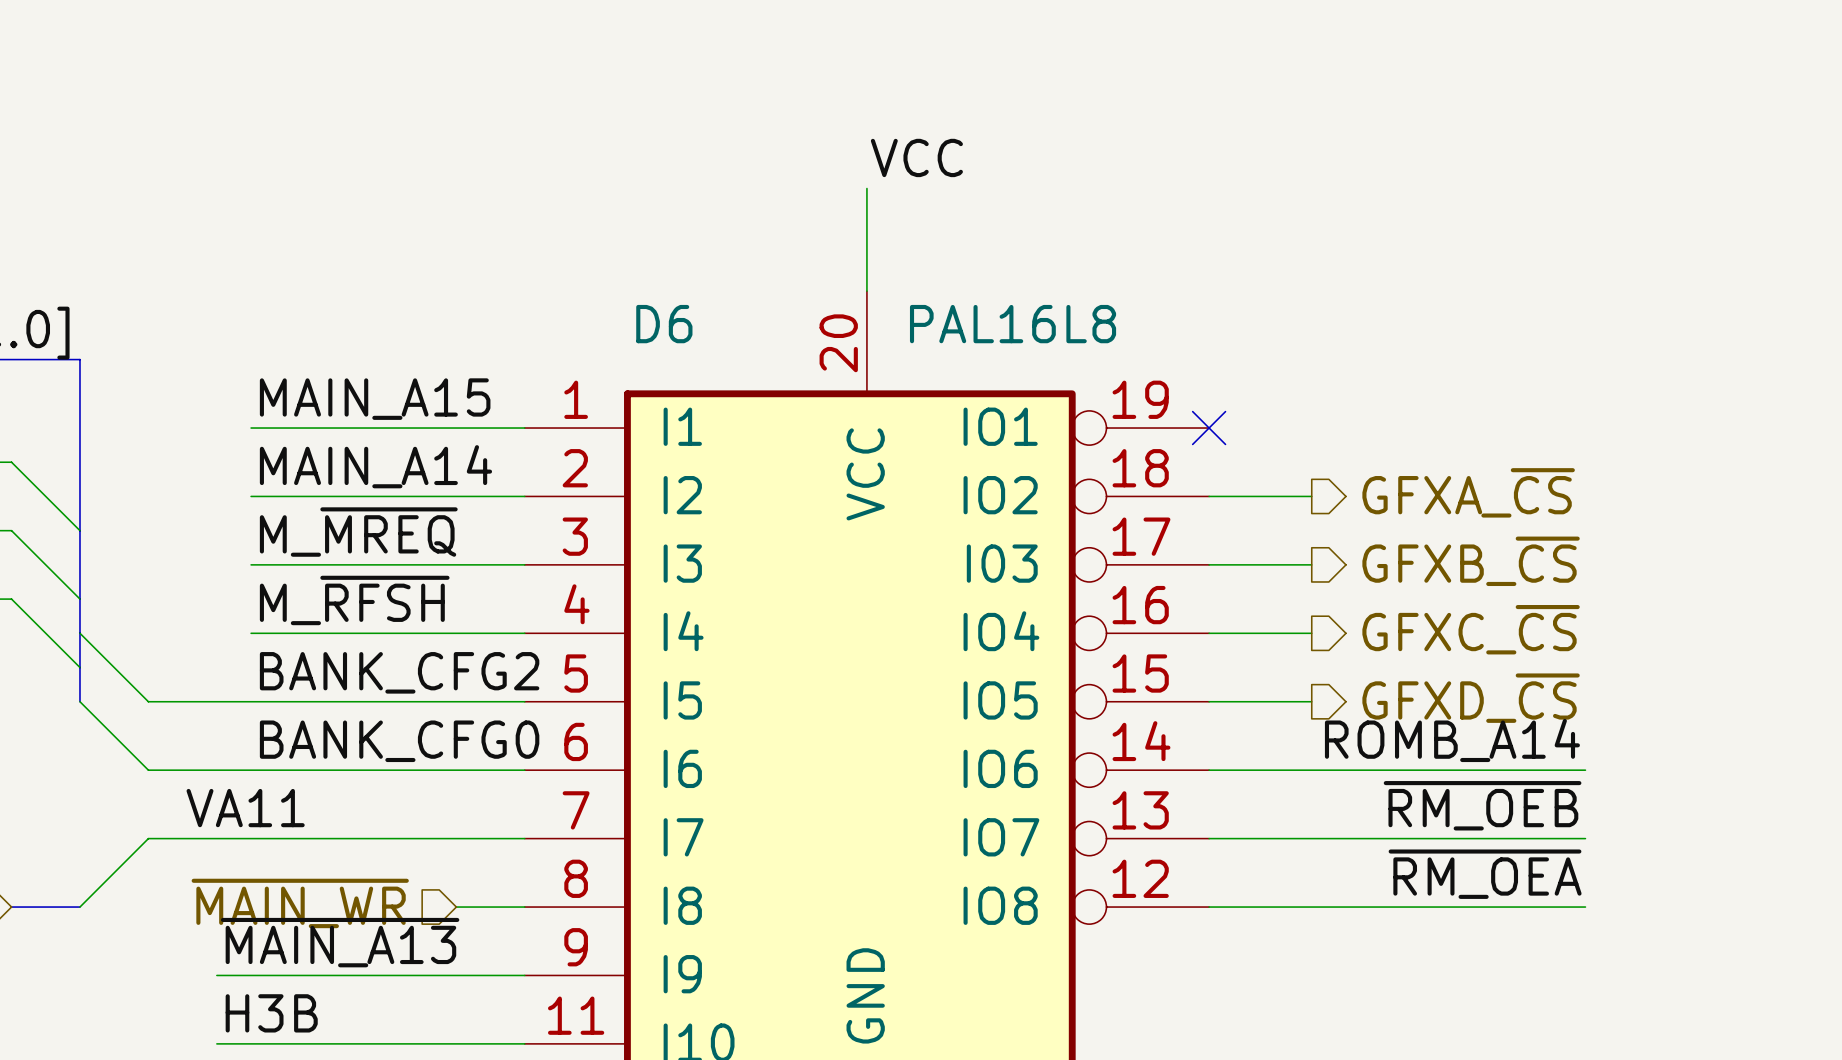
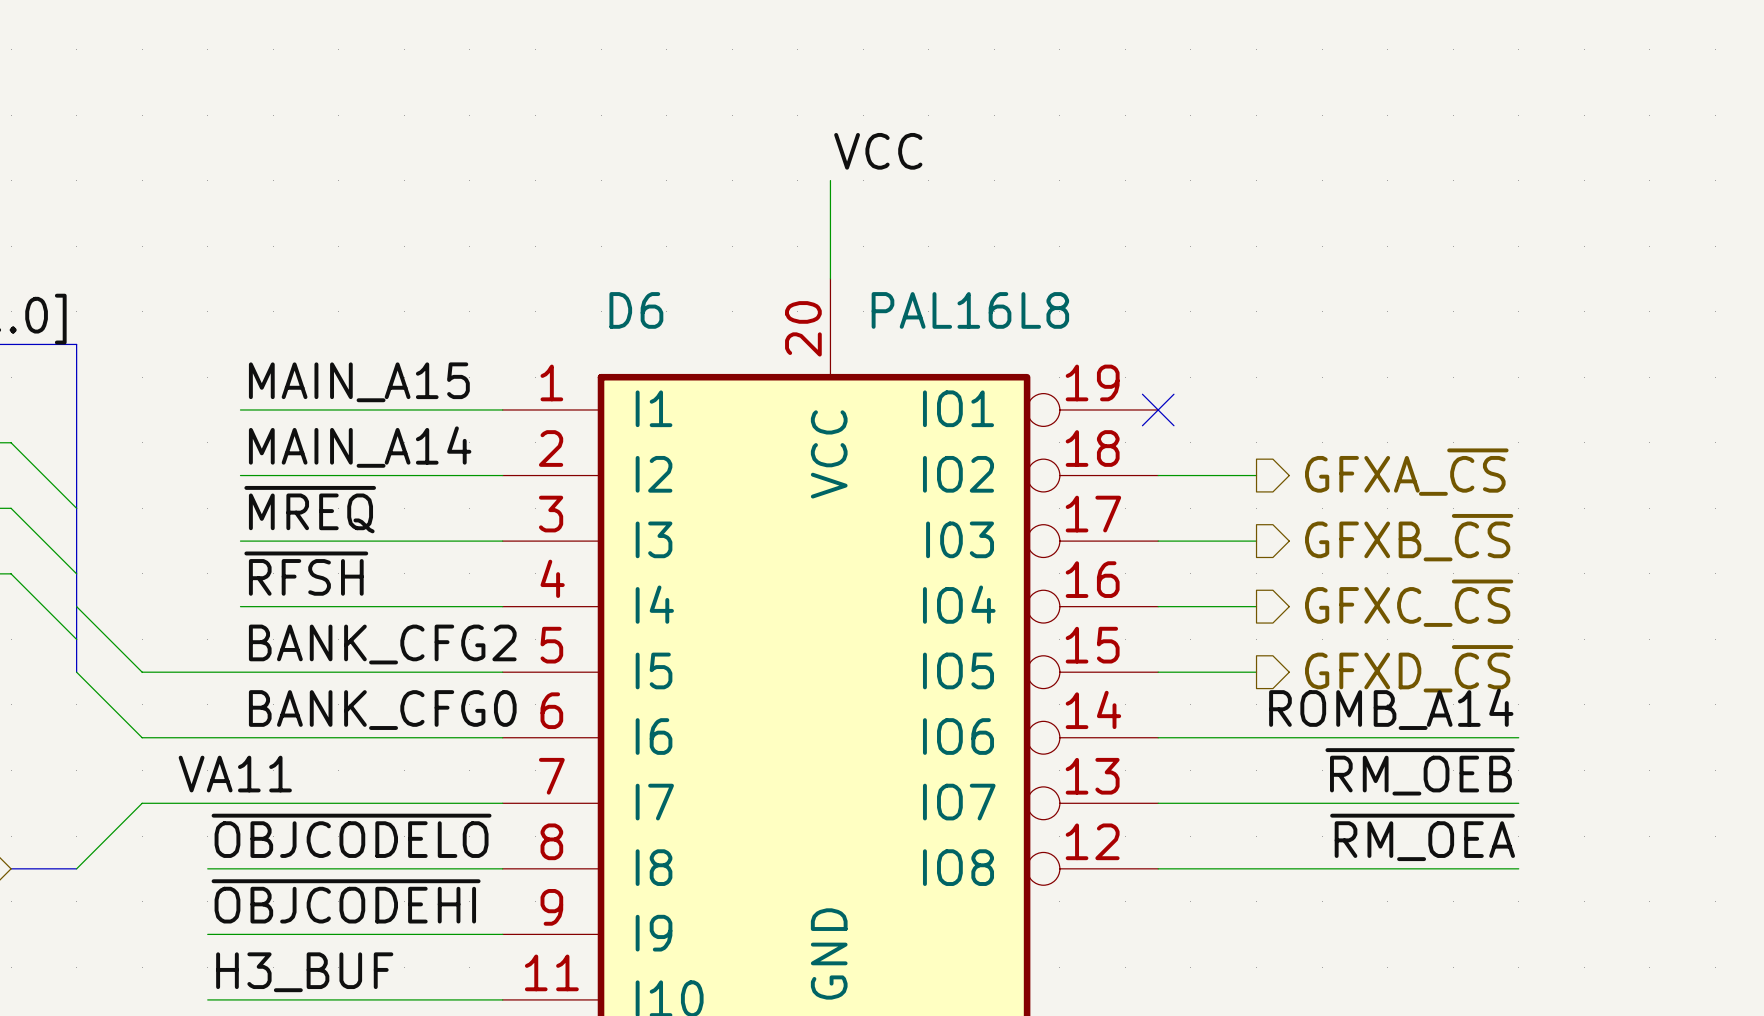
label: M_~{MREQ} (358, 532) -> ~{MREQ} (310, 509)
label: M_~{RFSH} (354, 600) -> ~{RFSH} (306, 573)
label: none -> ~{OBJCODELO} (351, 835)
hierarchical label: ~{MAIN_WR} (300, 903) -> none
wire: none -> (207, 868) (437, 868)
label: ~{MAIN_A13} (340, 942) -> ~{OBJCODEHI} (346, 901)
label: H3B (271, 1013) -> H3_BUF (304, 972)

